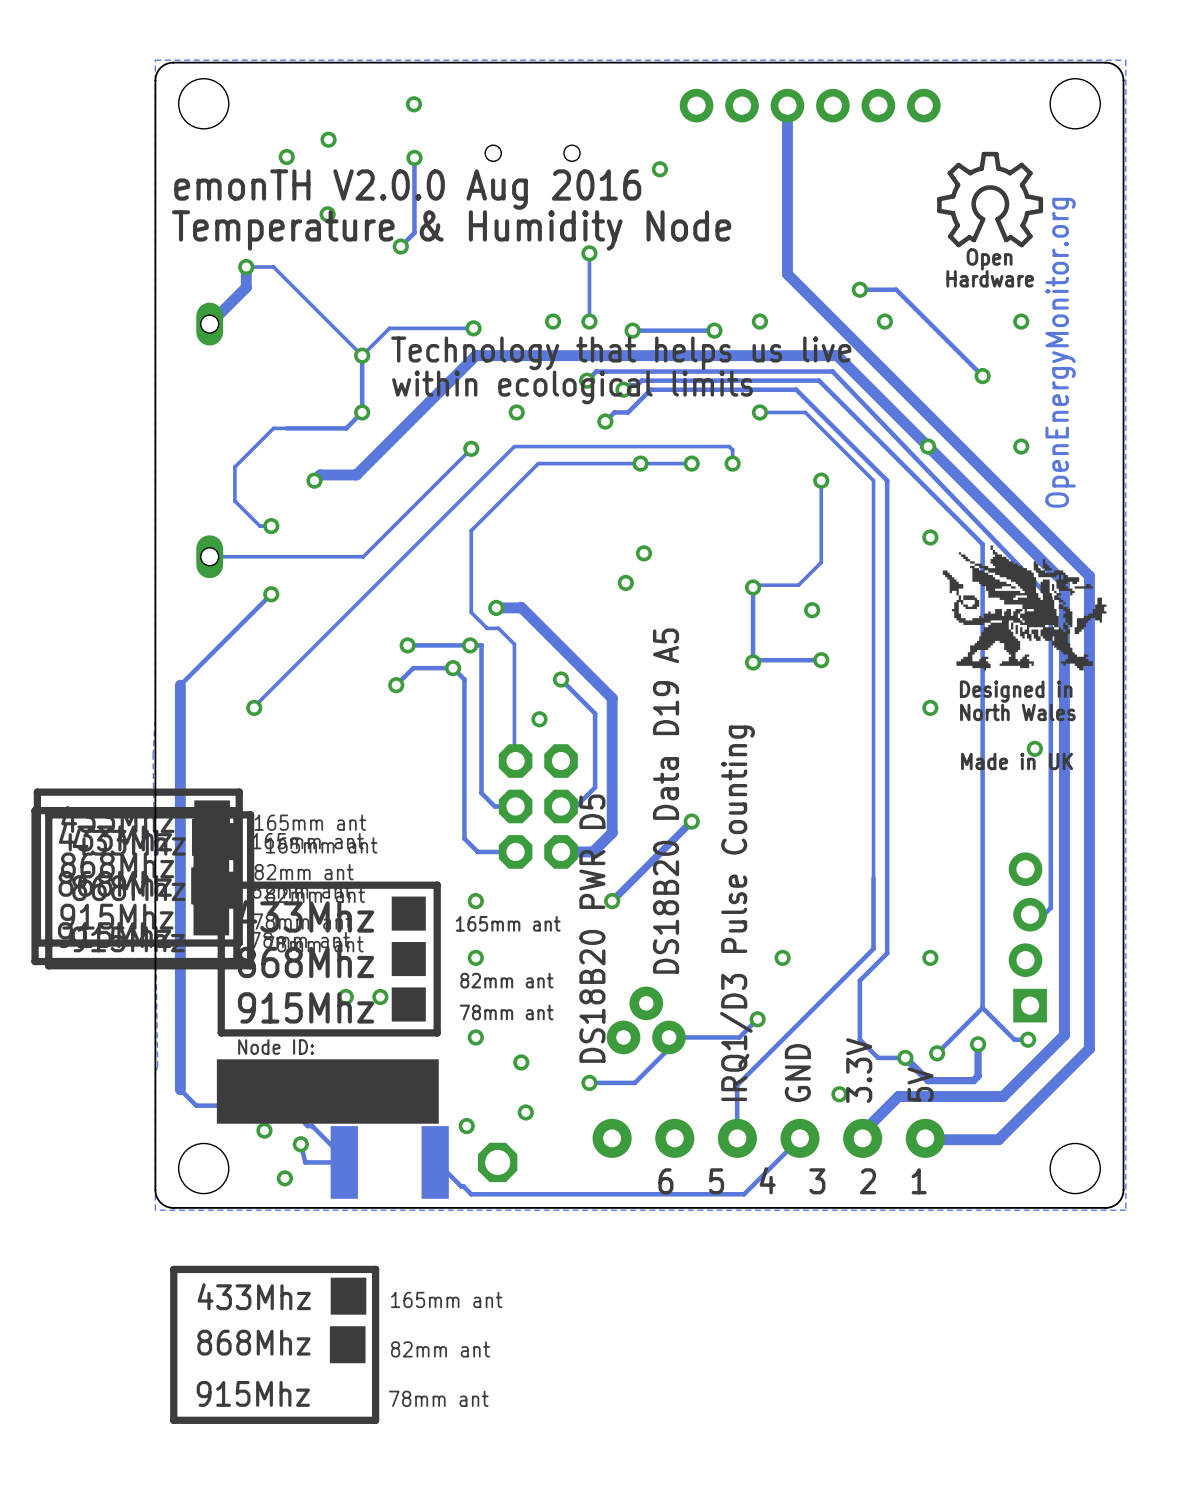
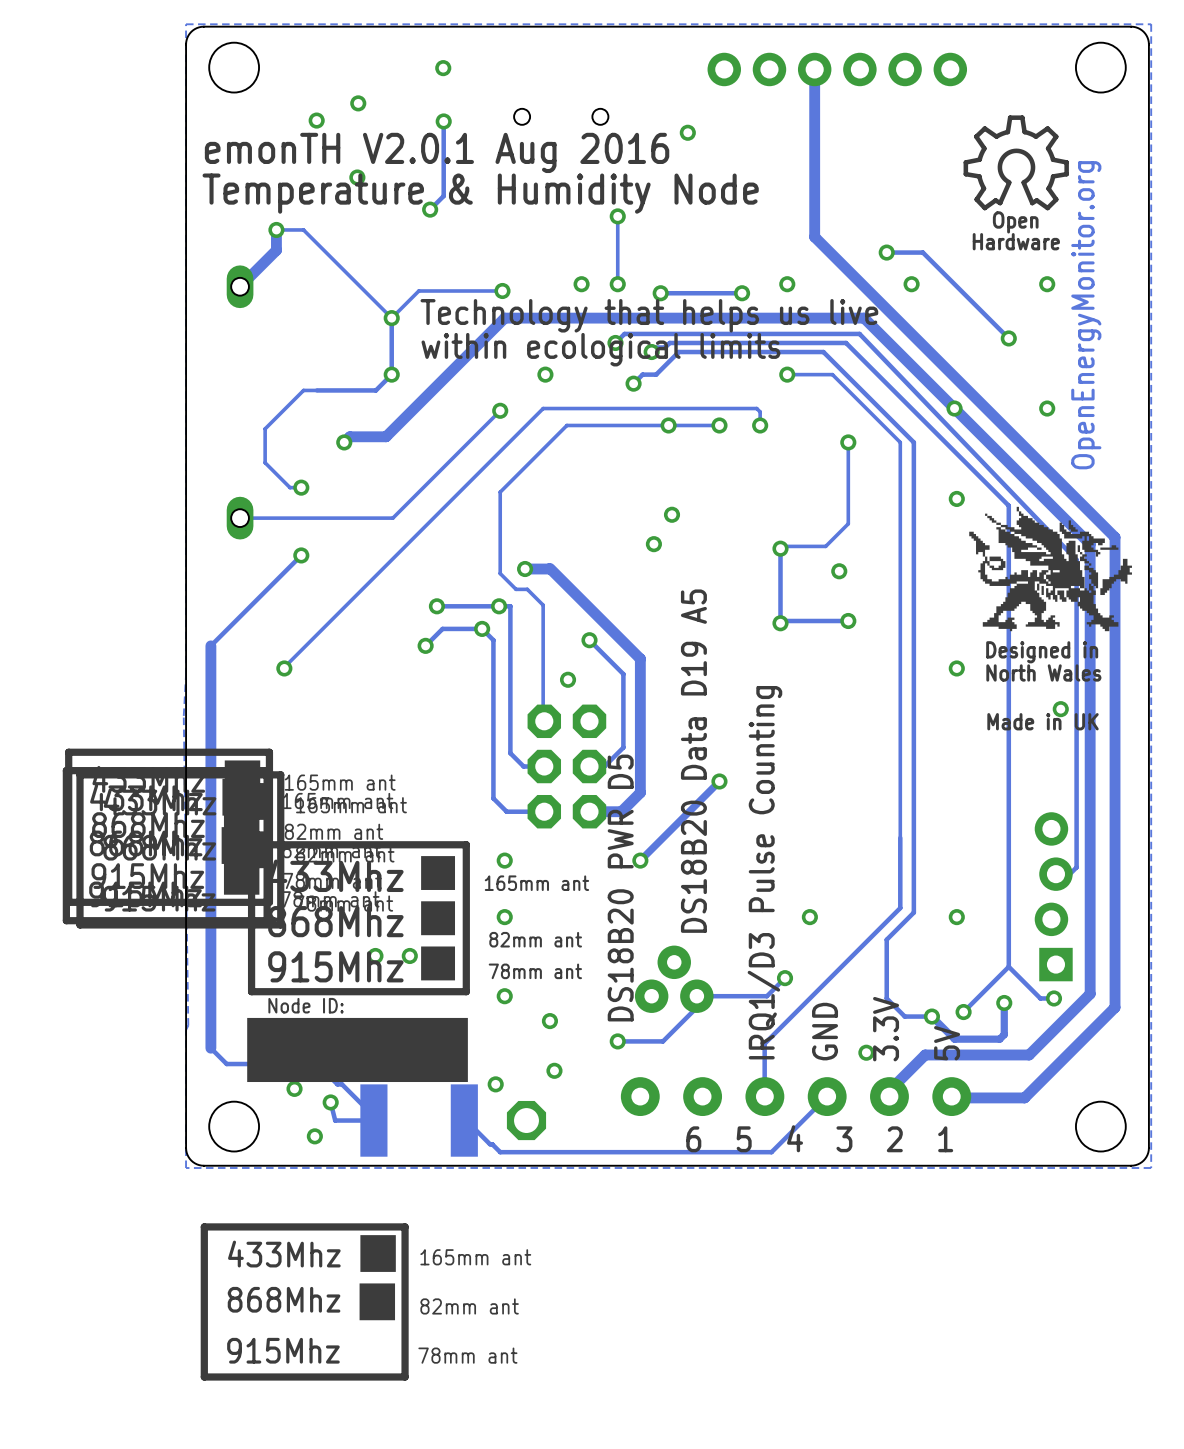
text: emonTH V2.0.0 Aug 2016 (407, 189) -> emonTH V2.0.1 Aug 2016 (437, 152)

